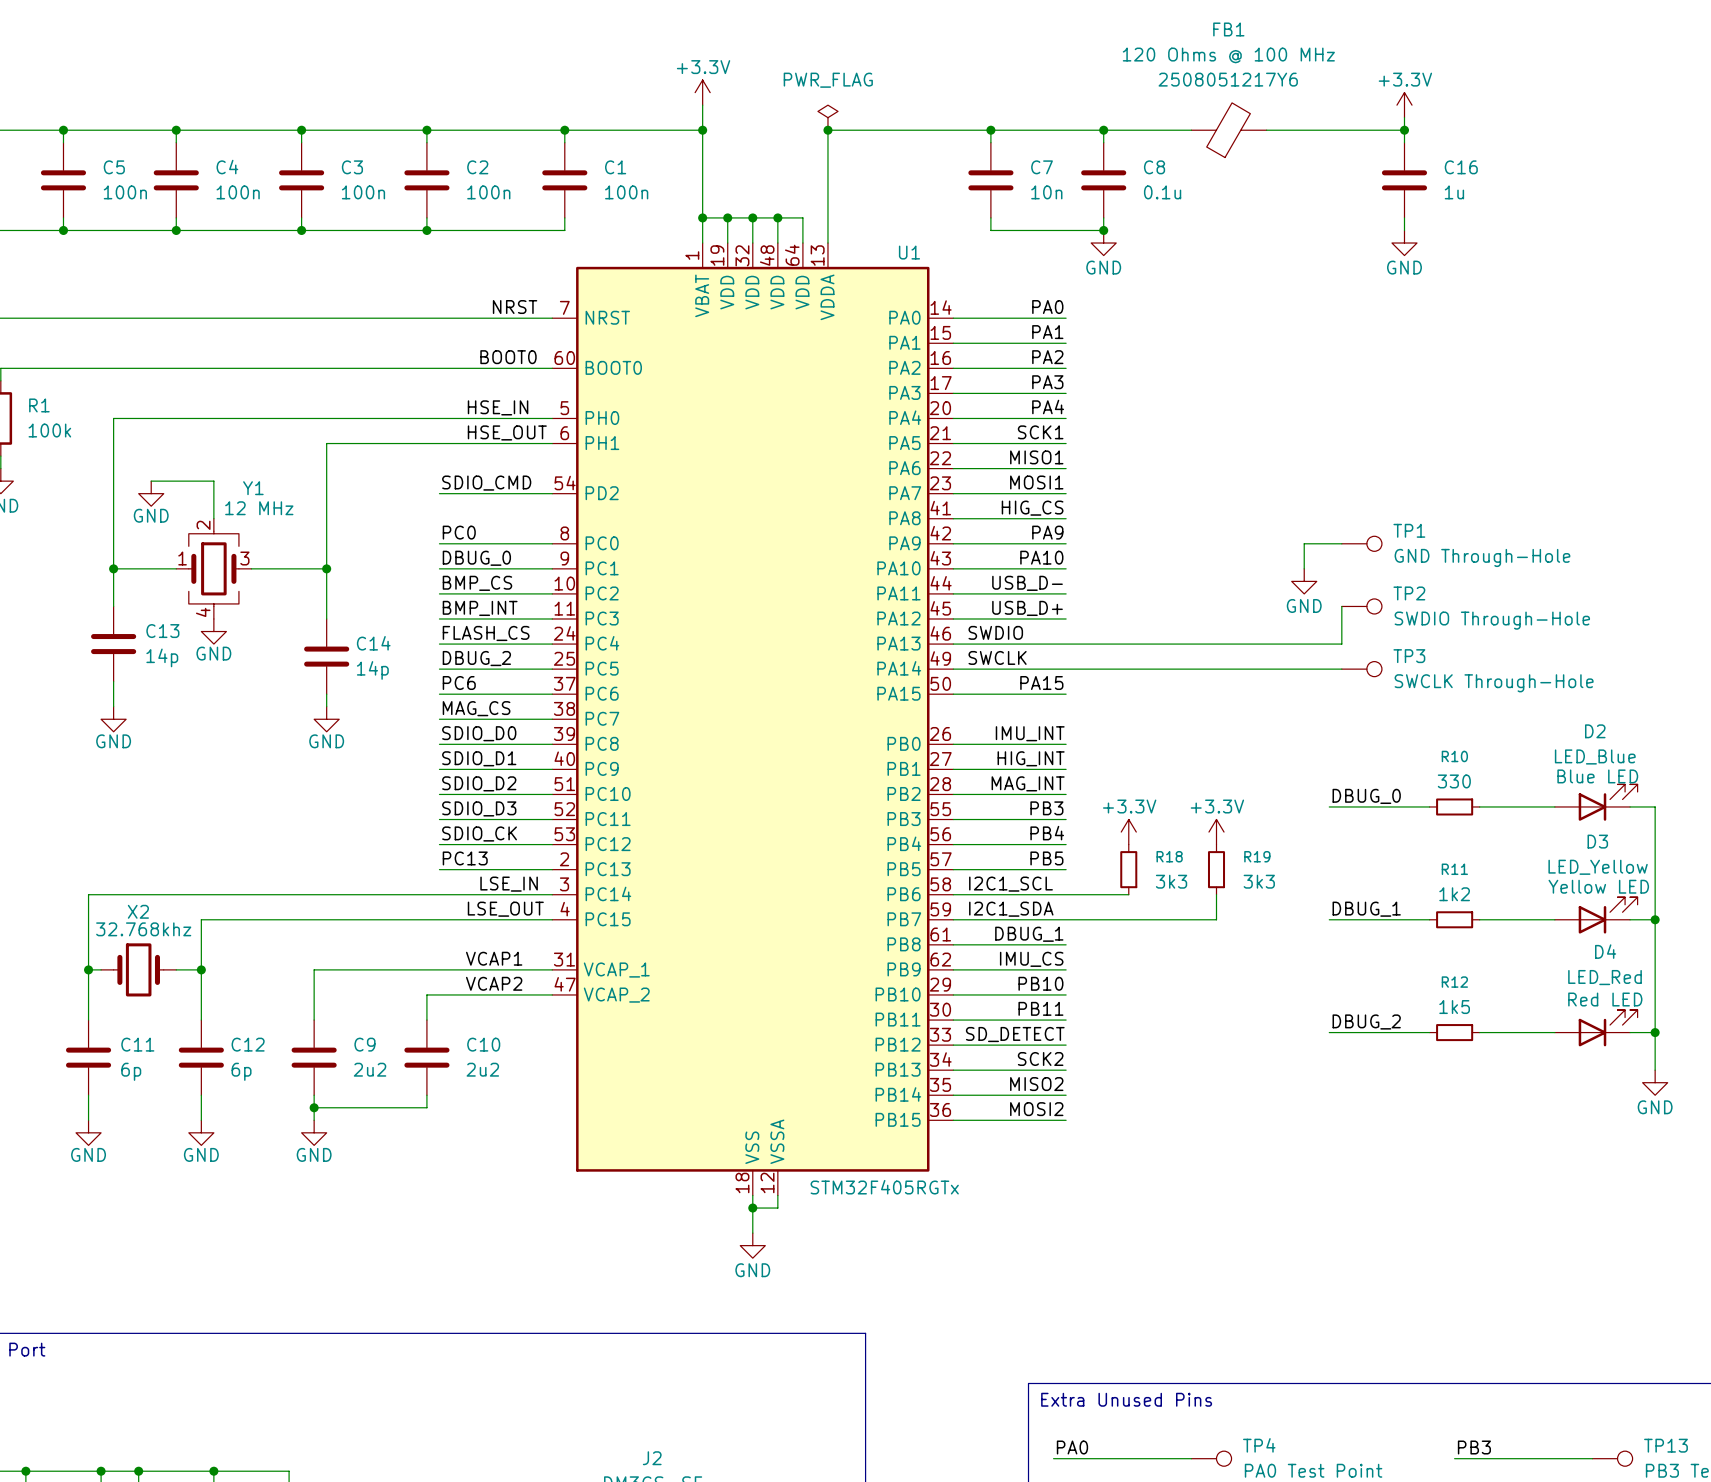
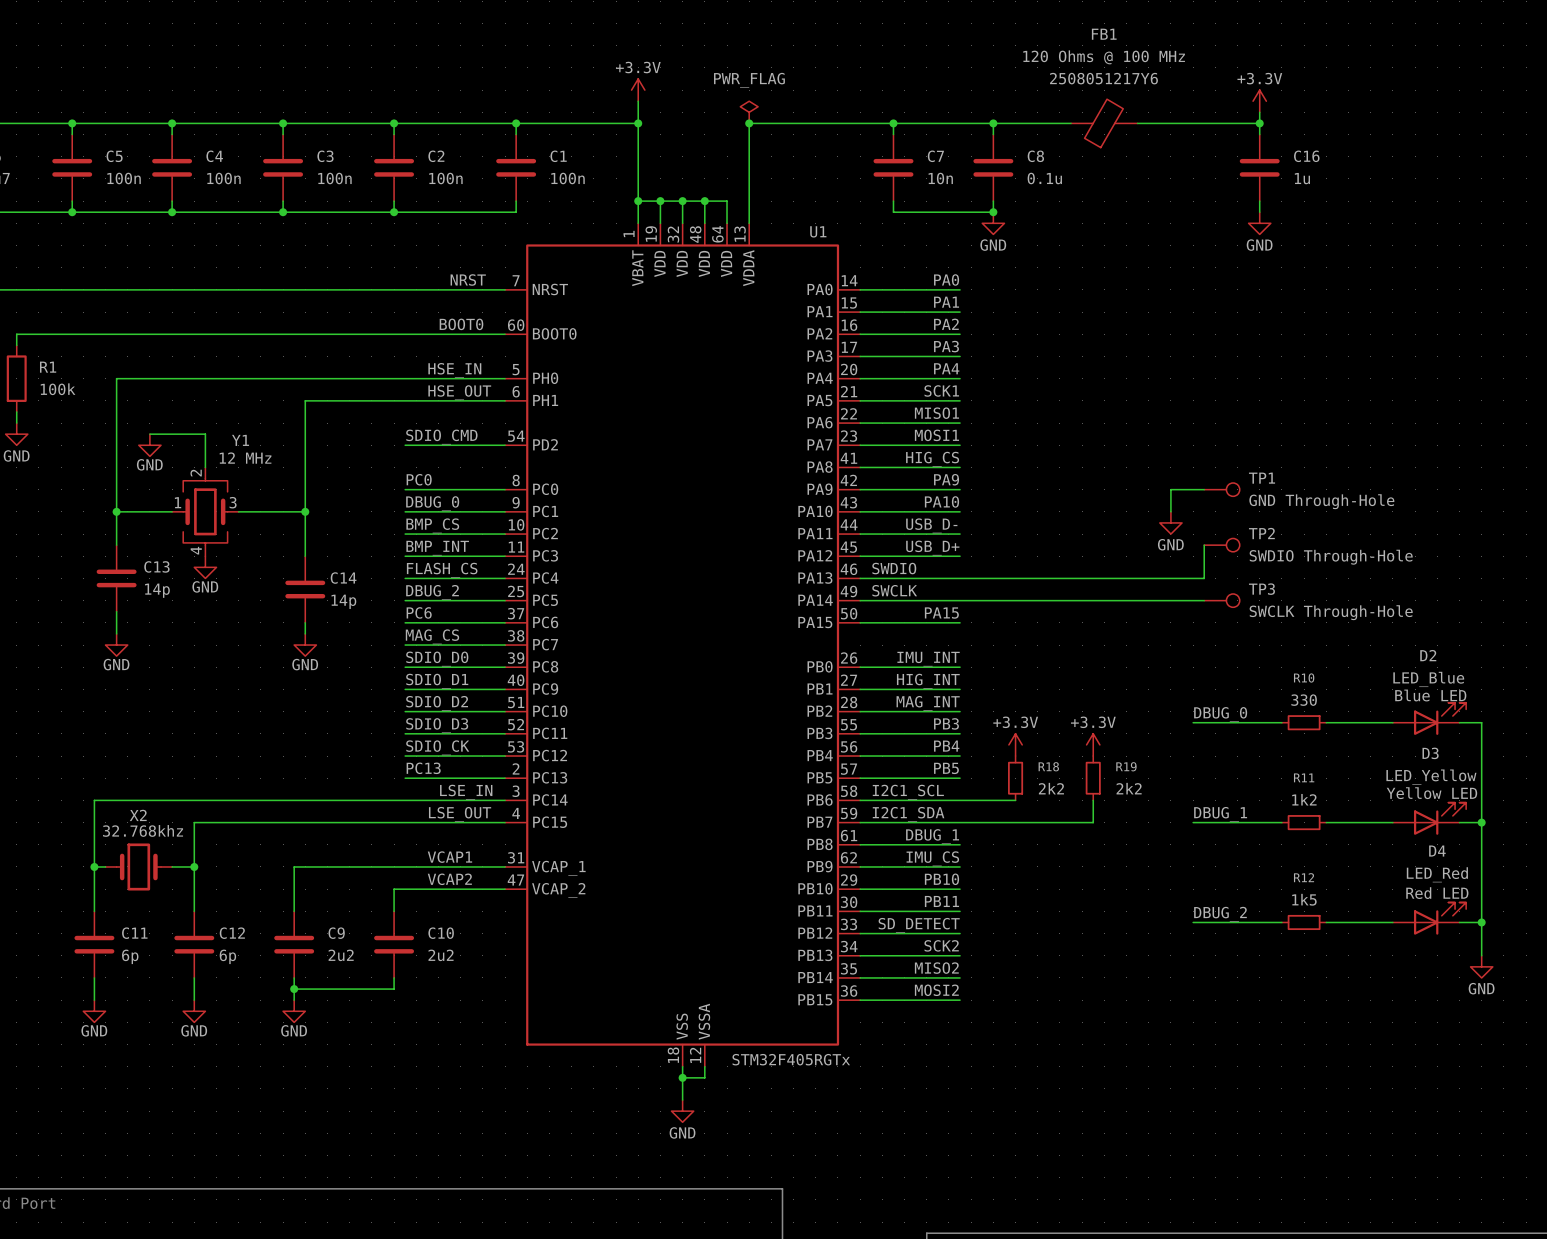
R18 value: 3k3 (1171, 881) -> 2k2 (1051, 788)
R19 value: 3k3 (1259, 881) -> 2k2 (1129, 788)

